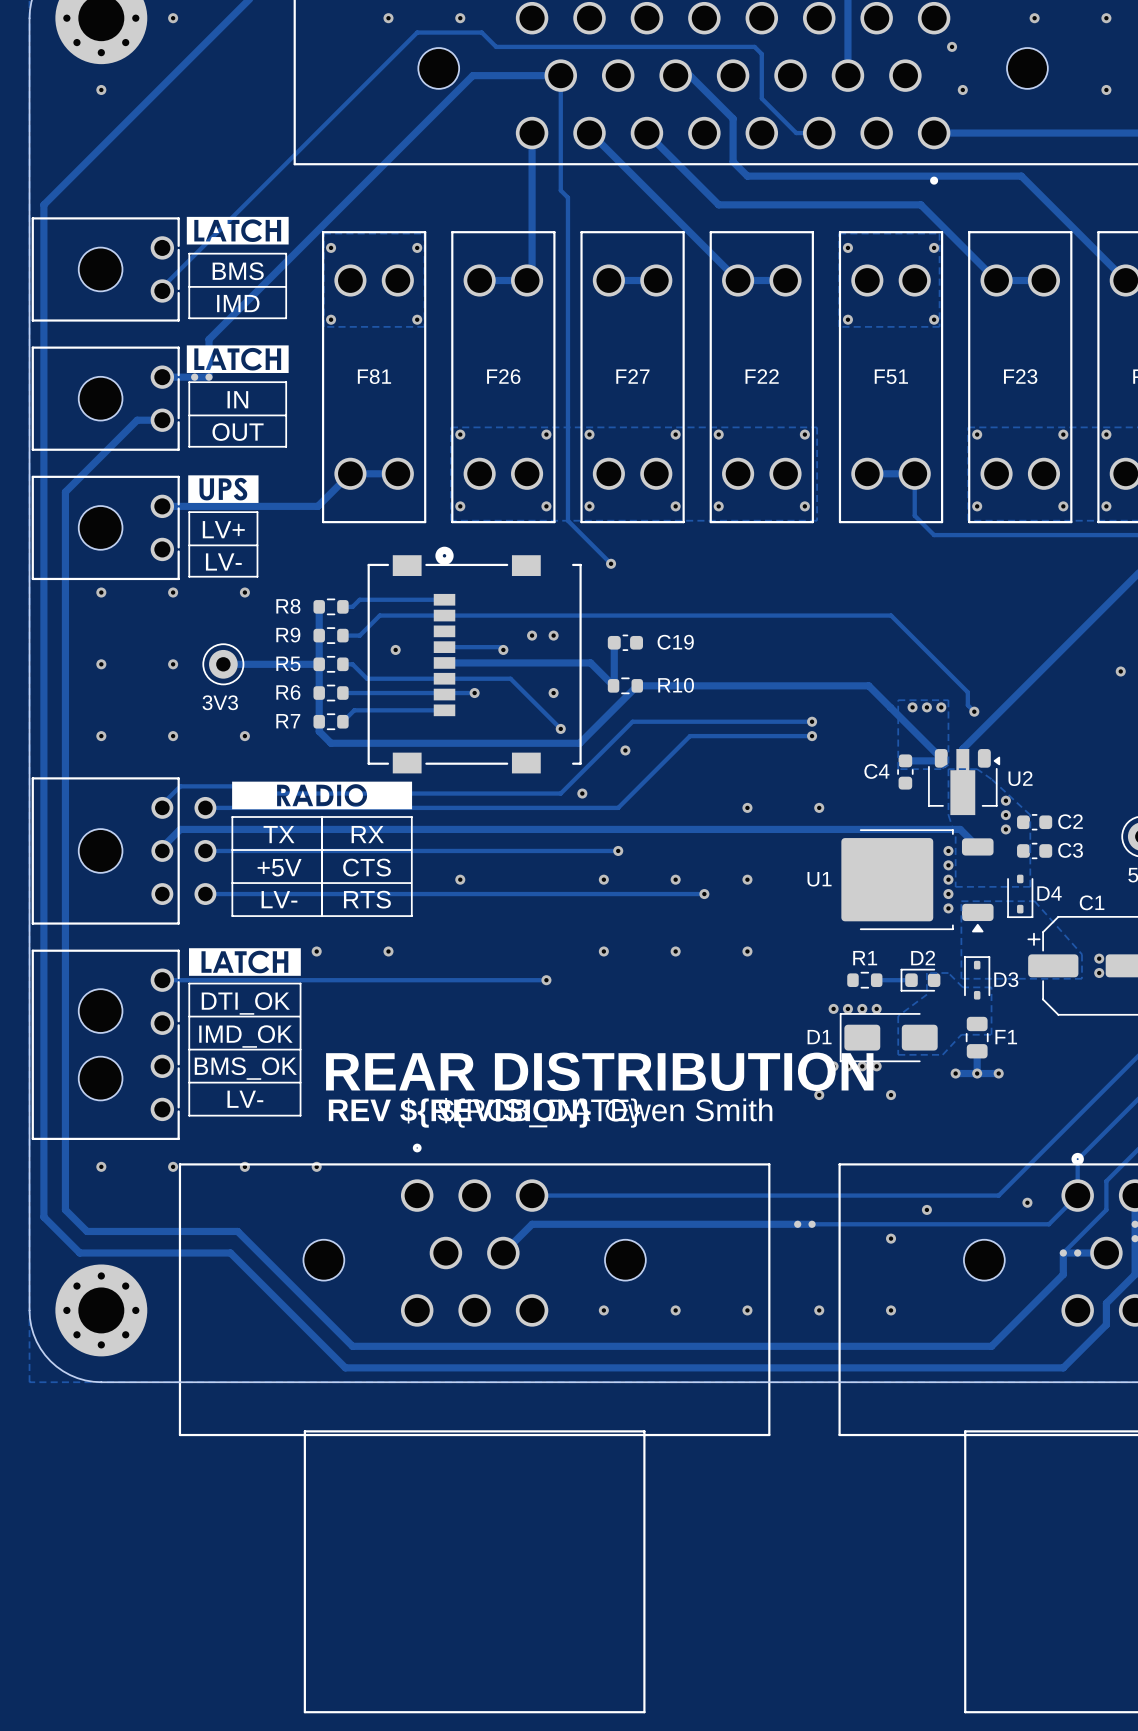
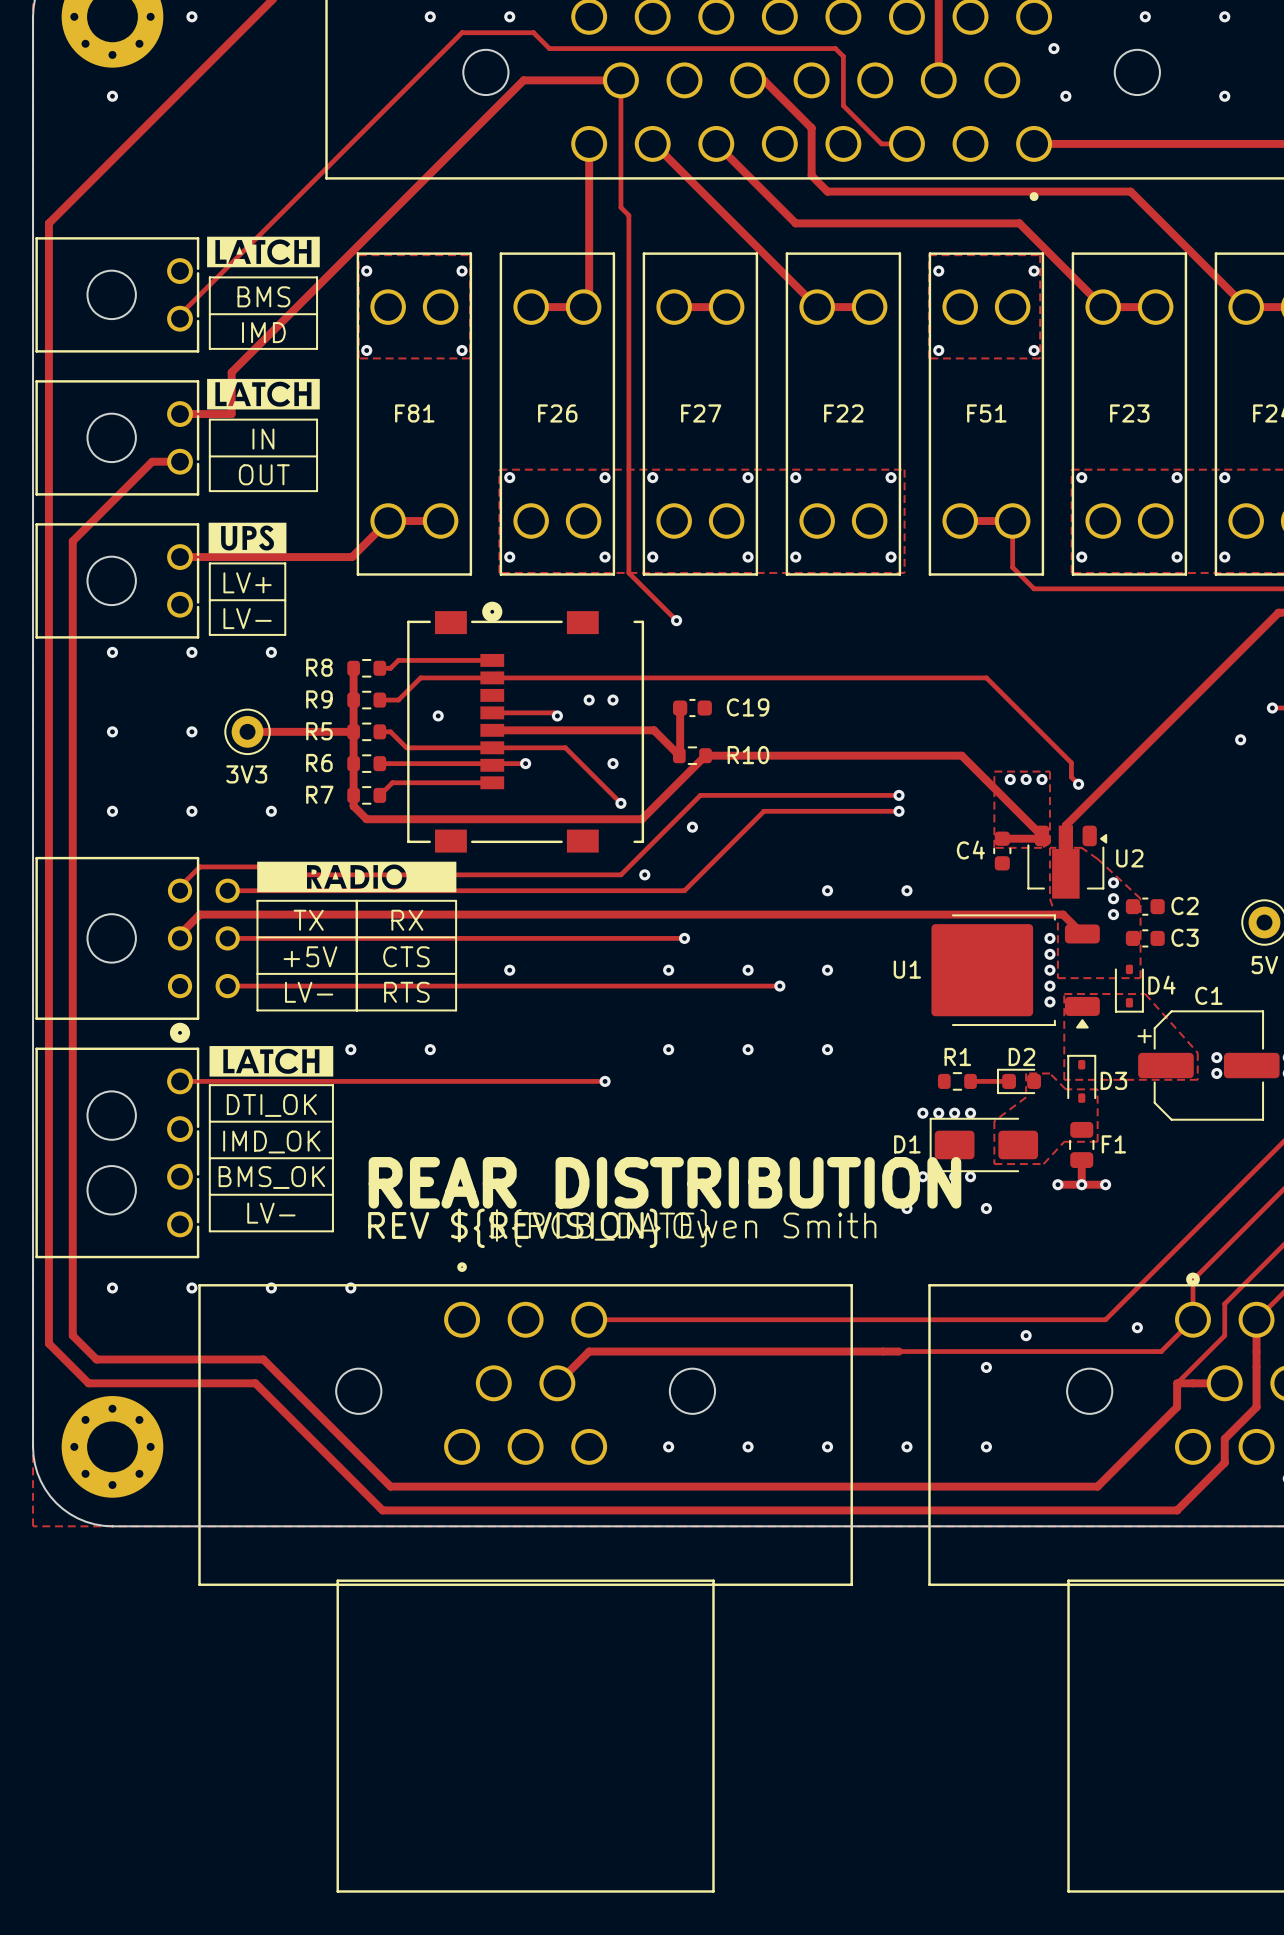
part footprint: [31, 777, 217, 941] -> [35, 856, 240, 1043]

